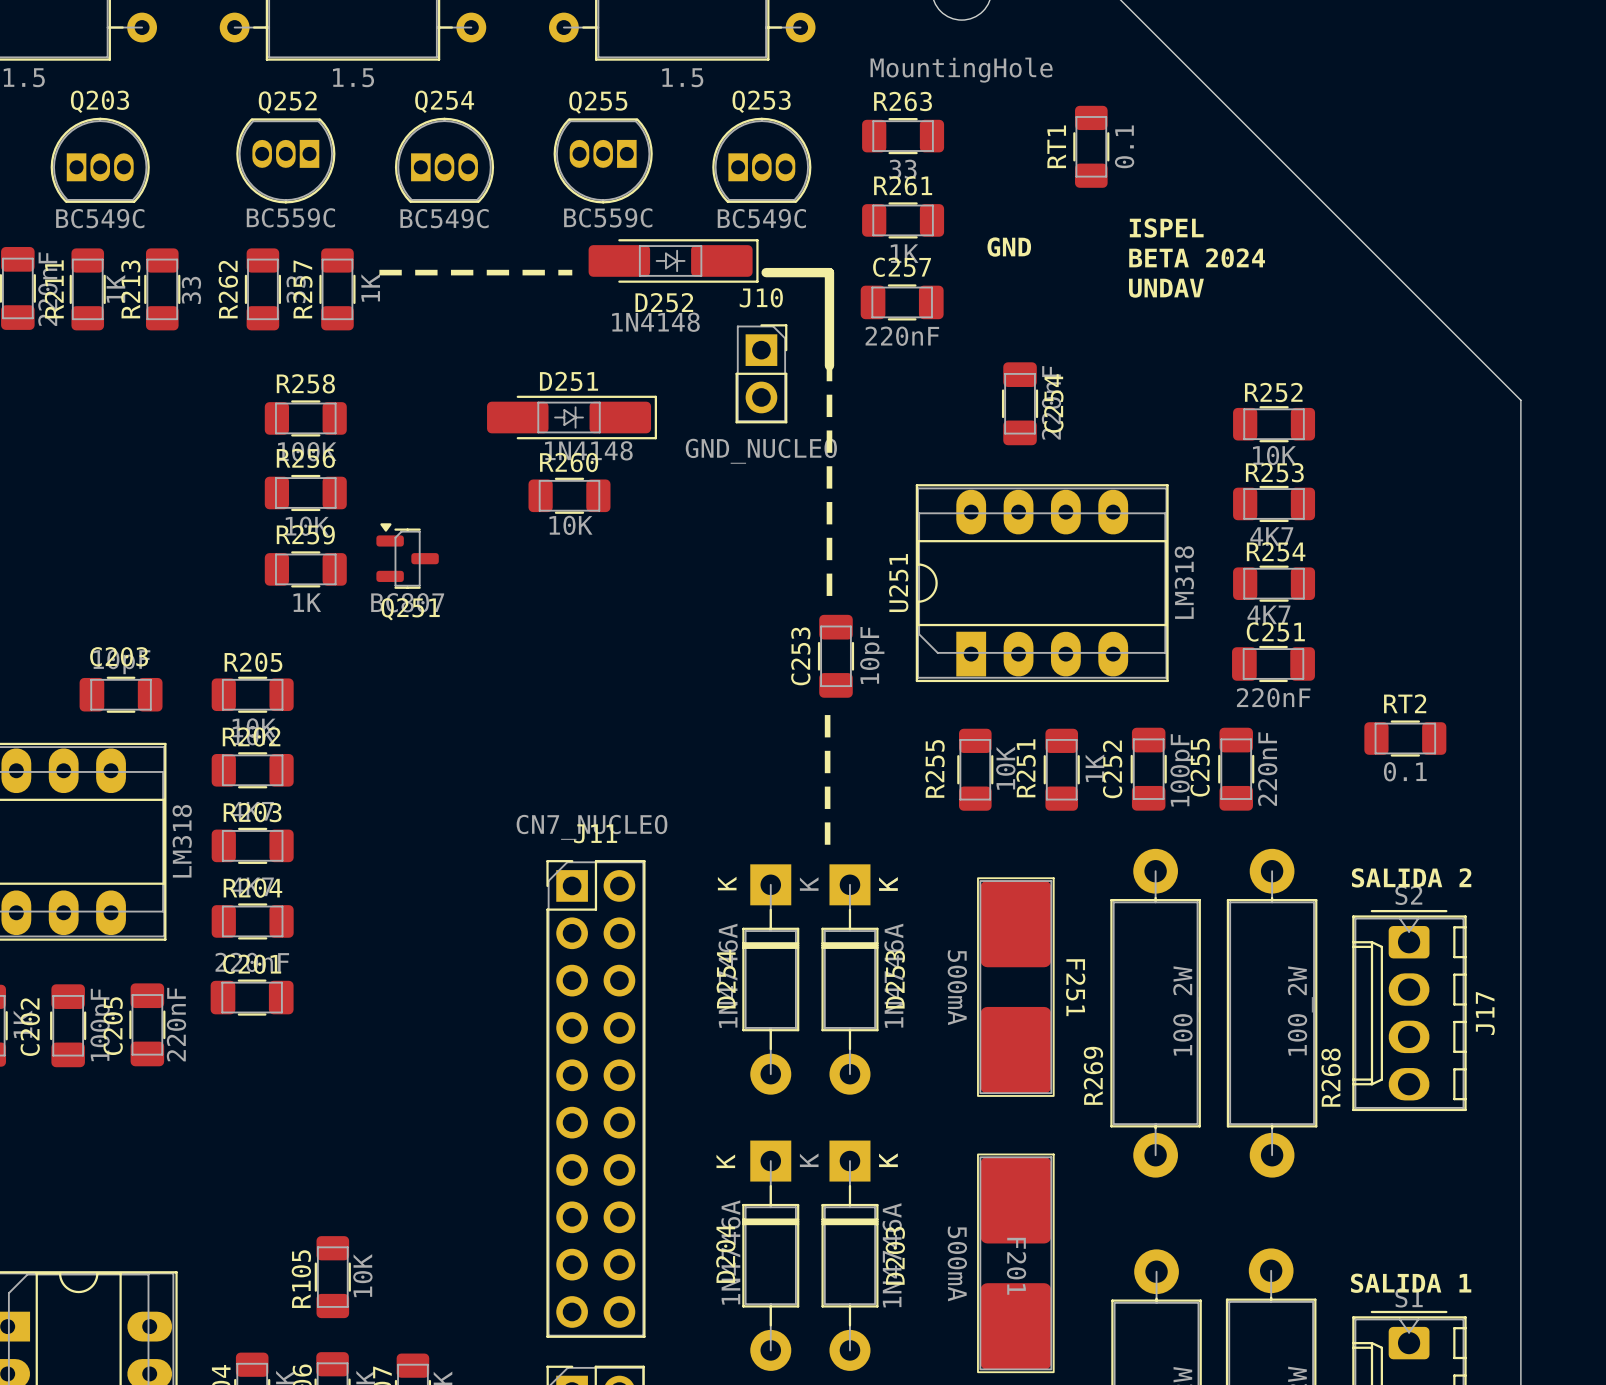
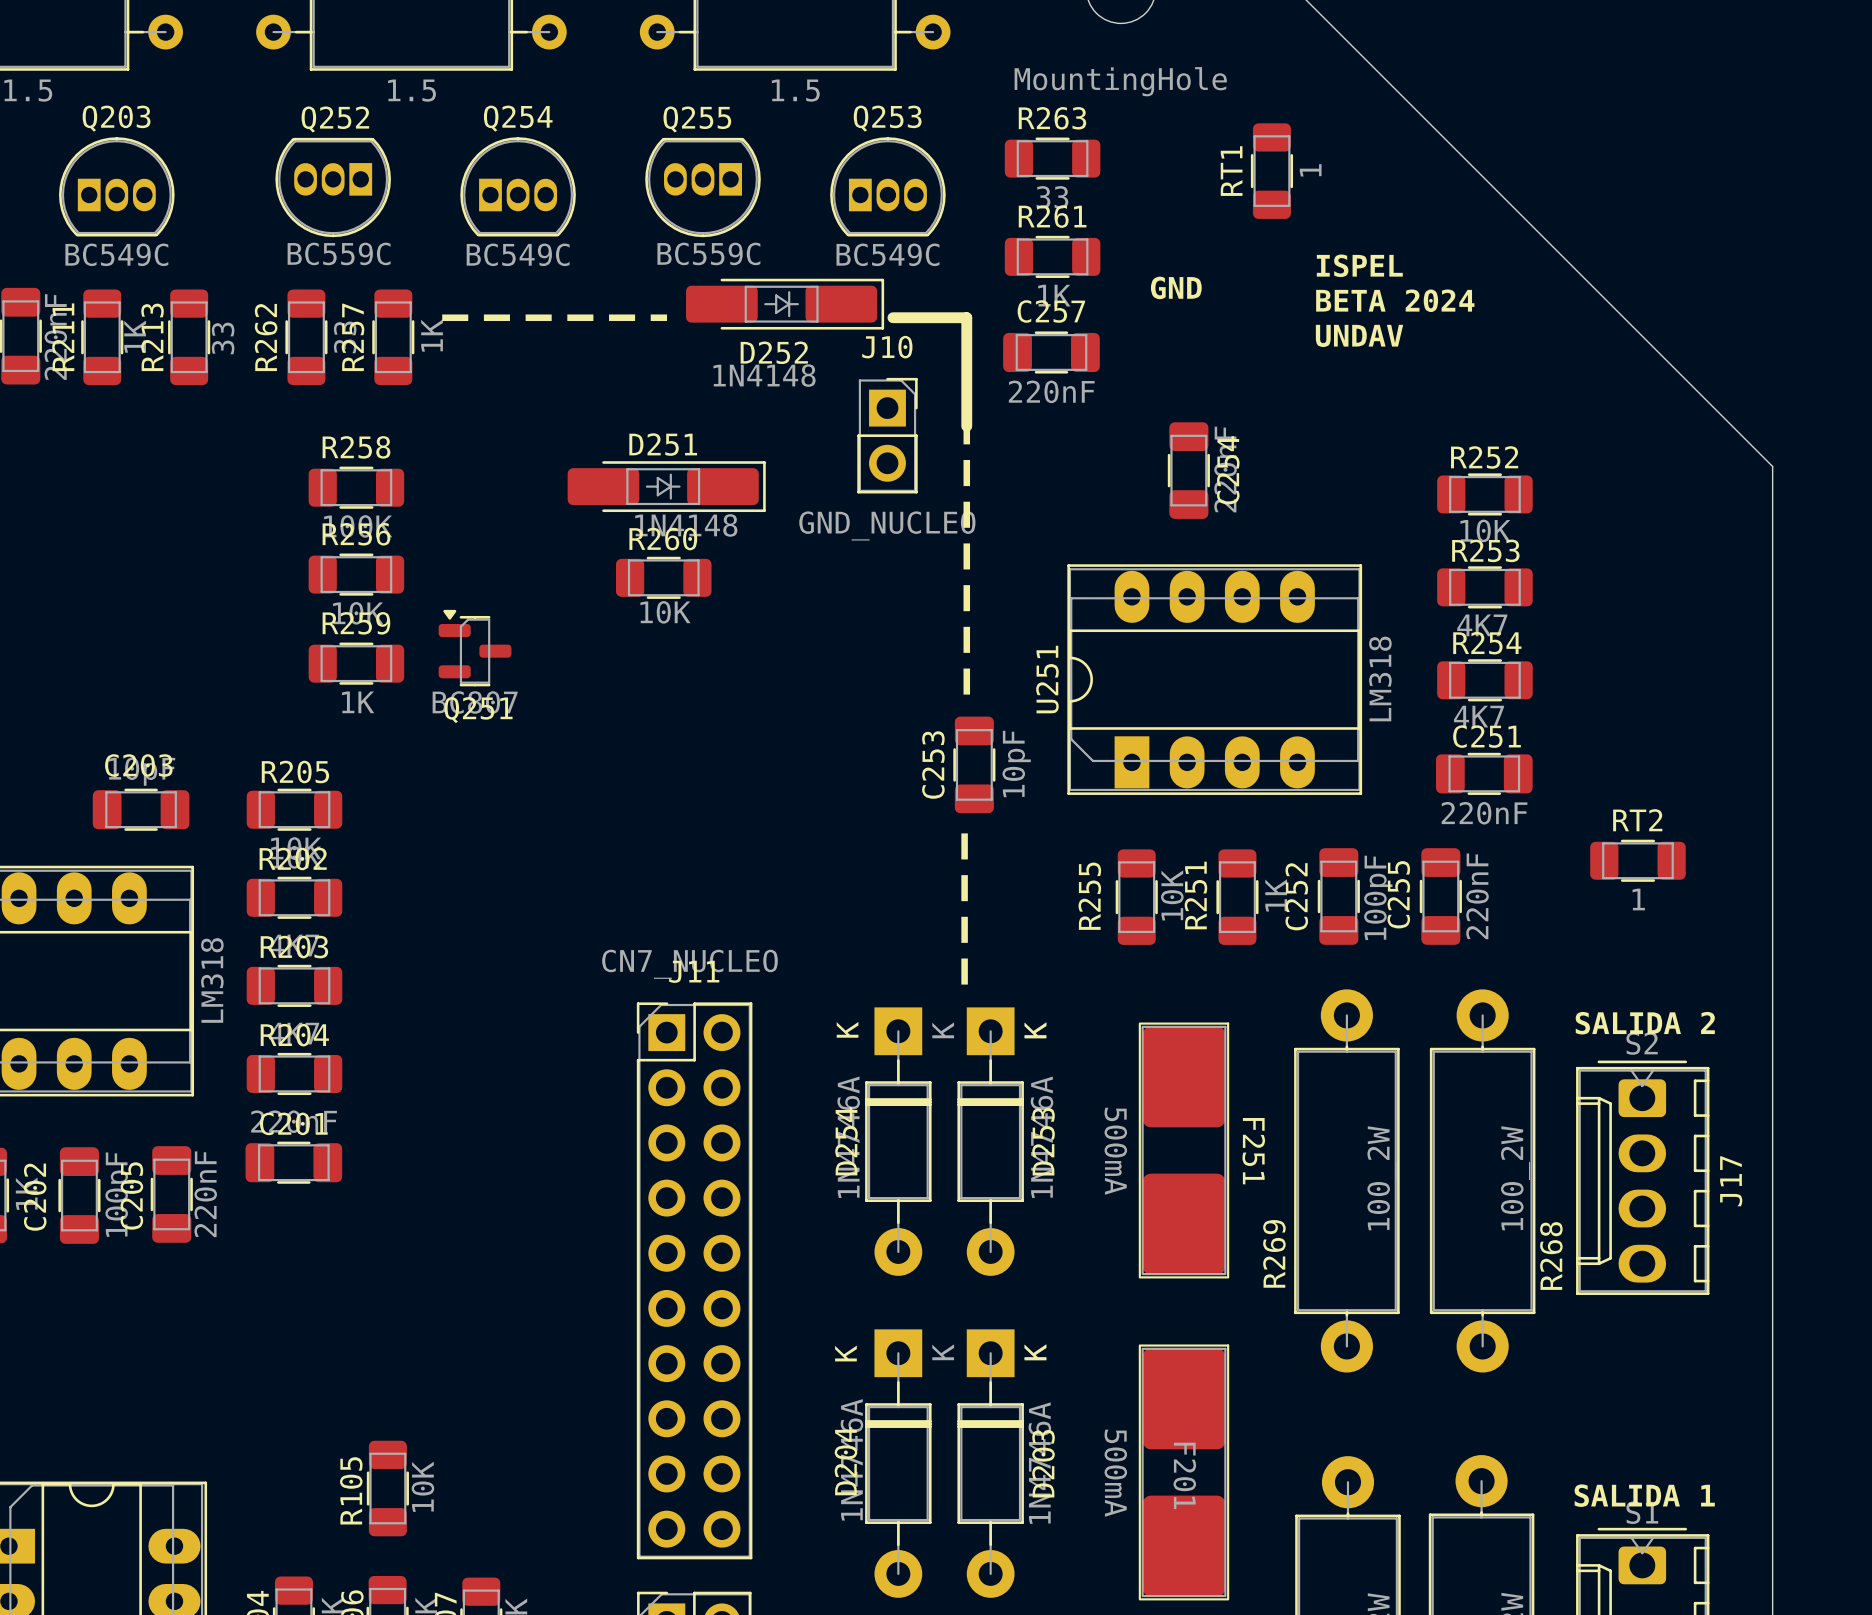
RT1 value: 0.1 (1124, 146) -> 1 (1310, 170)
RT2 value: 0.1 (1405, 771) -> 1 (1638, 899)

